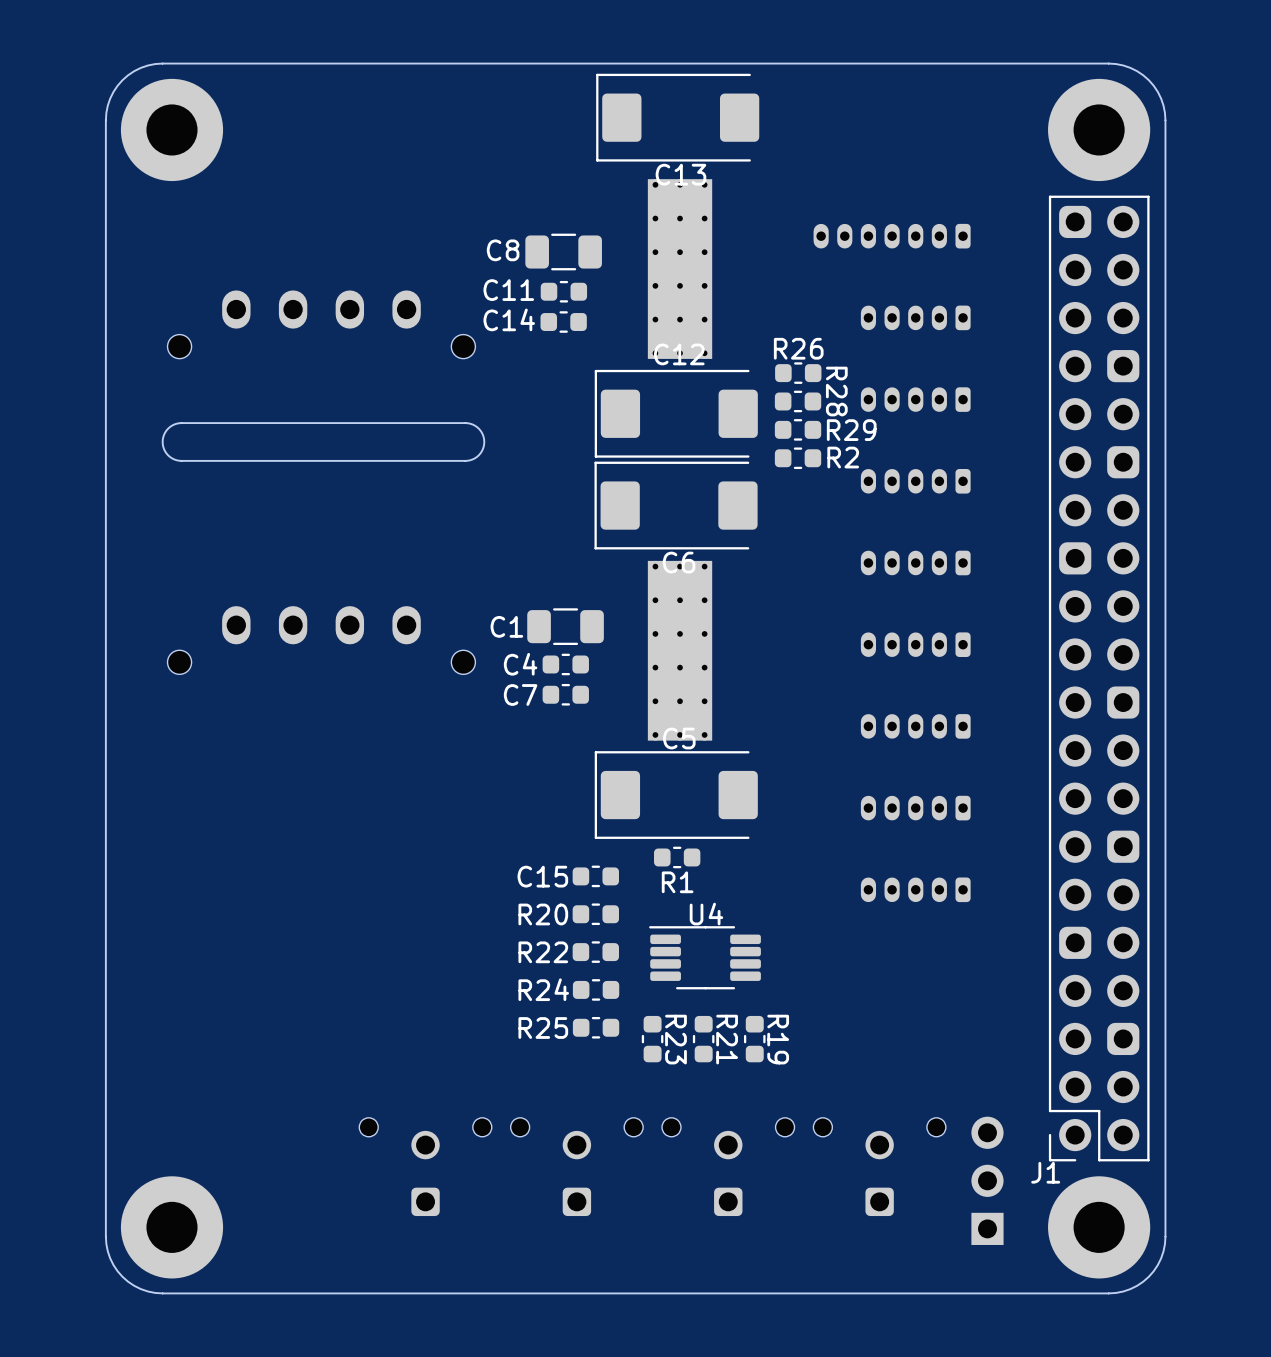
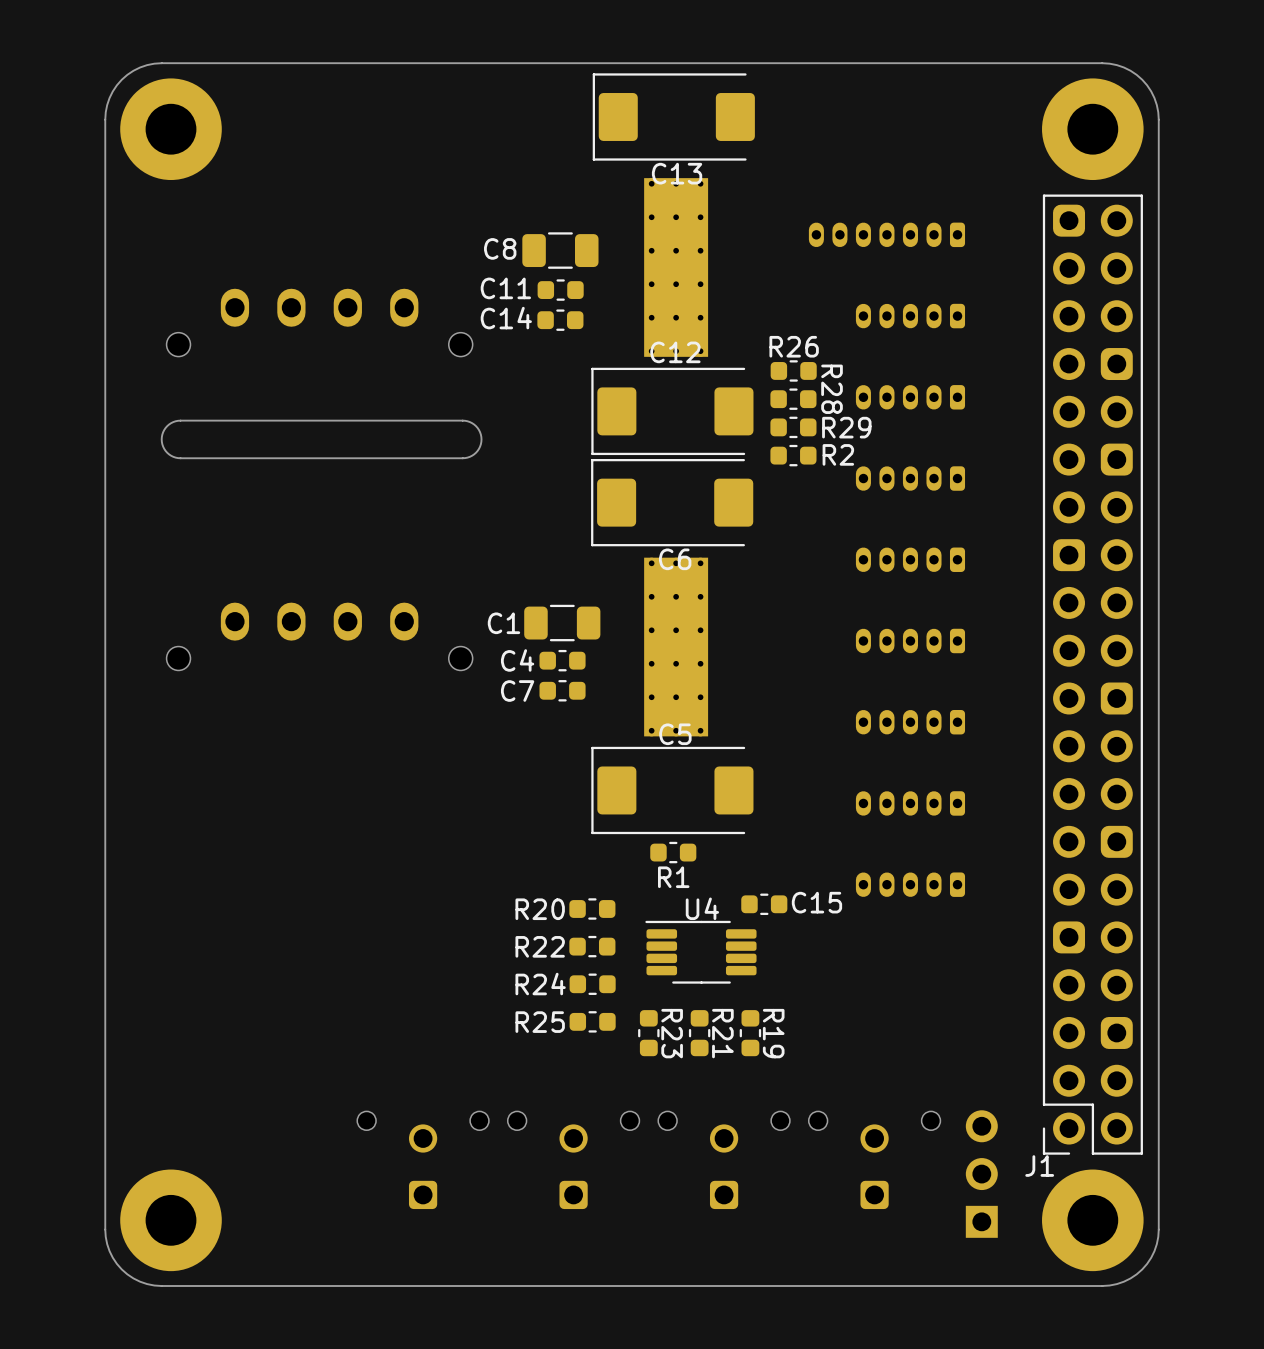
C15 name position: C15 (542, 876) -> C15 (816, 902)
C15 position: (595, 876) -> (764, 904)

